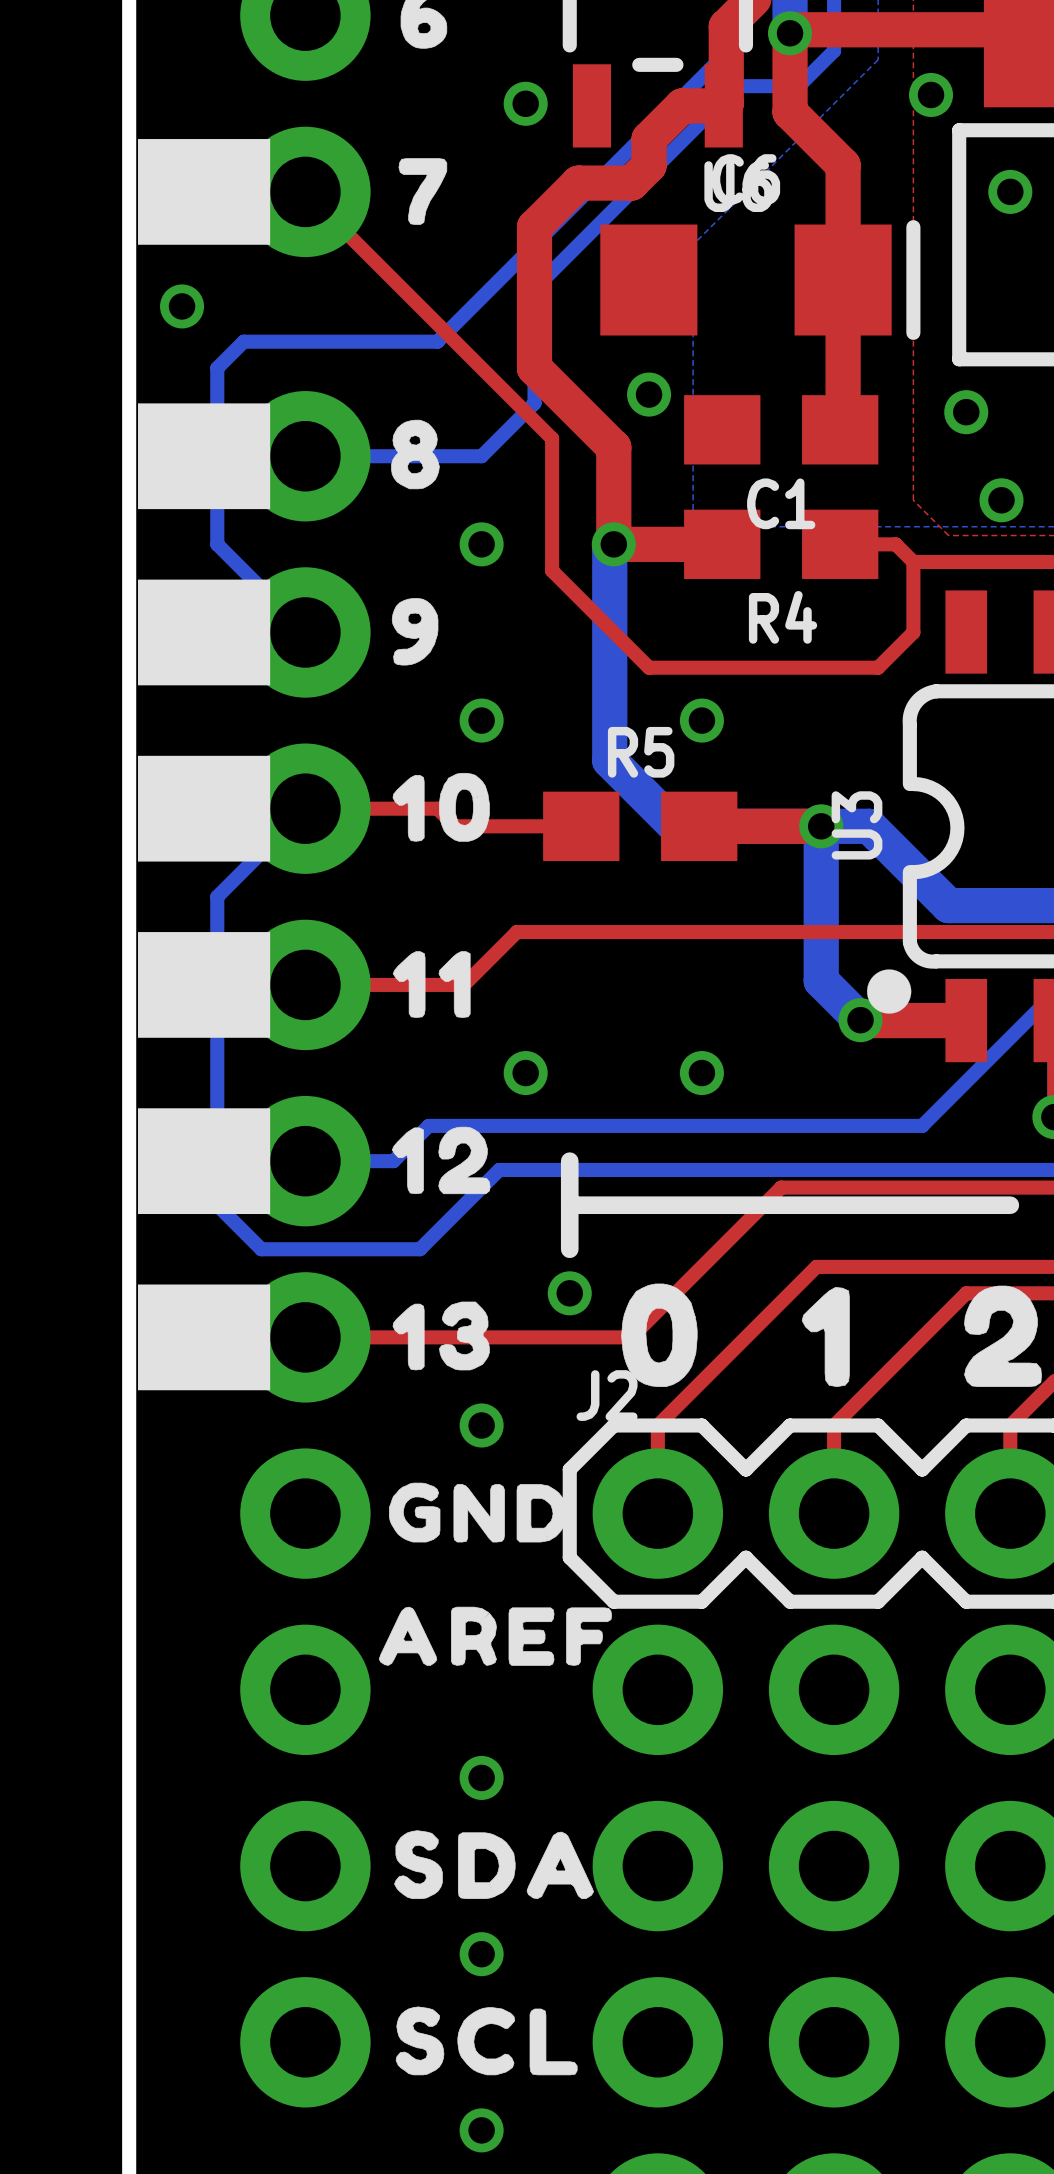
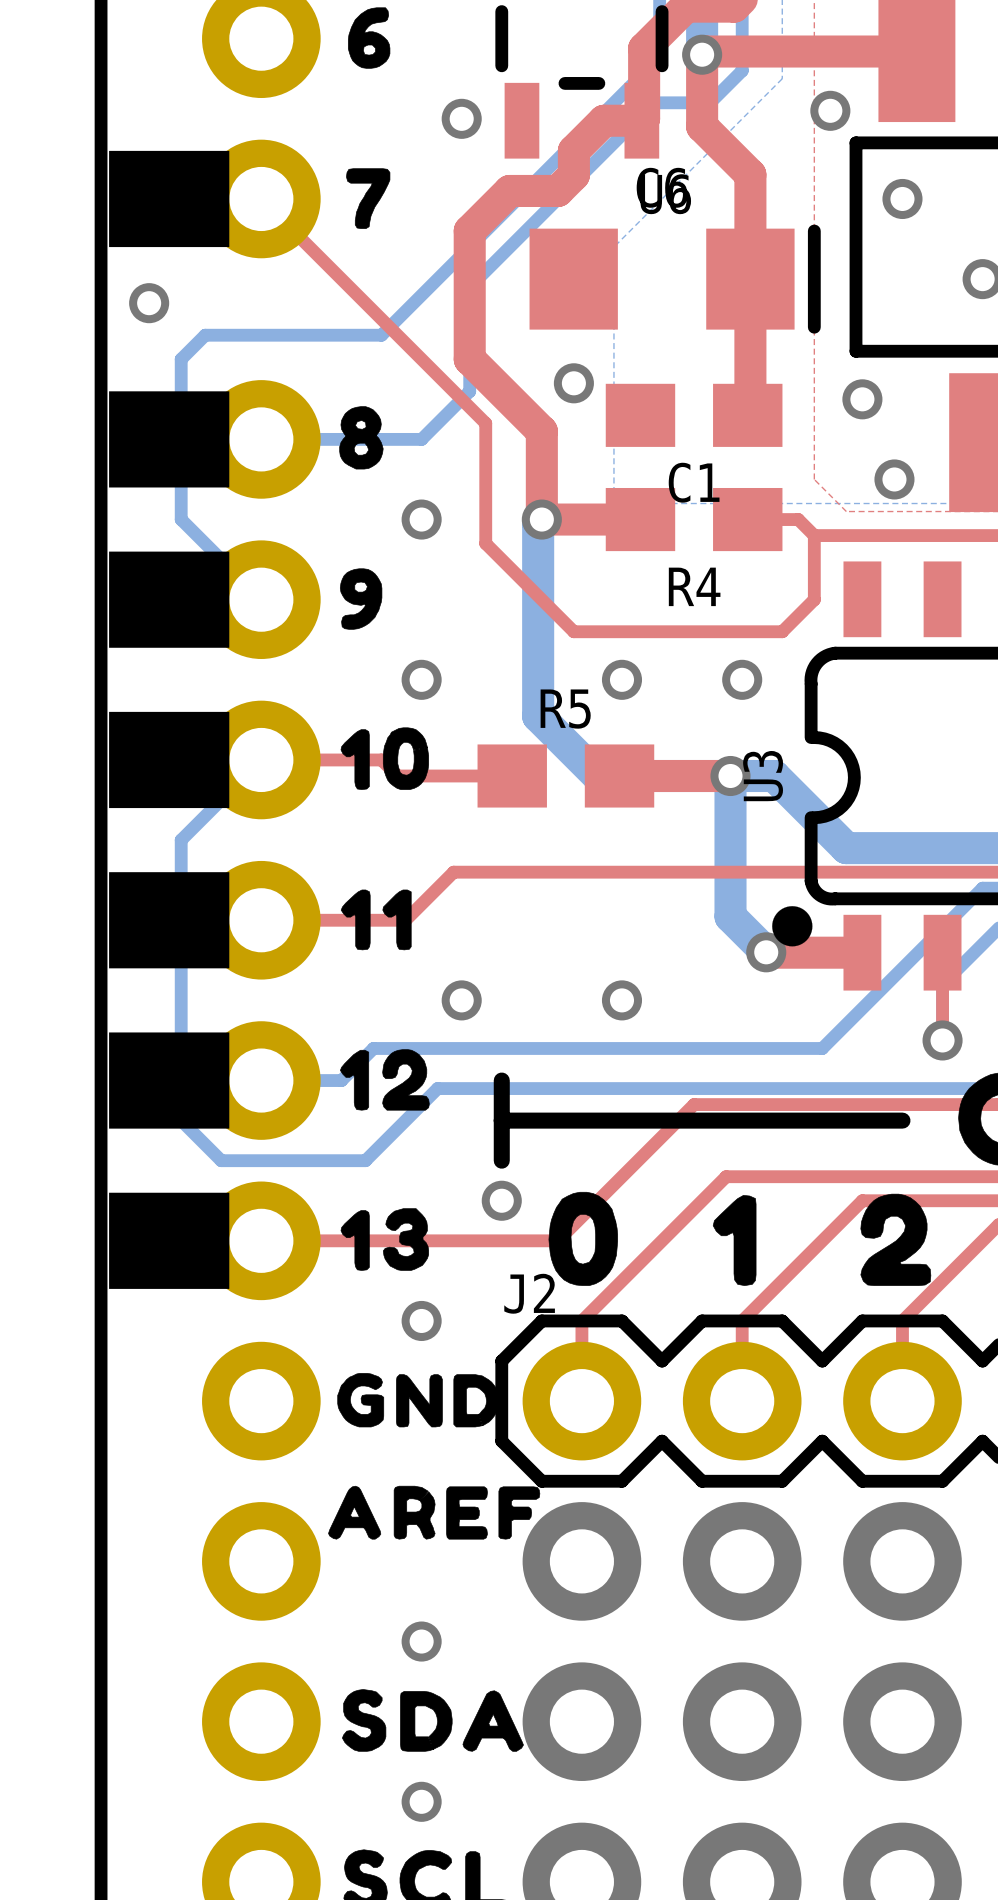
via: none -> (742, 679)

